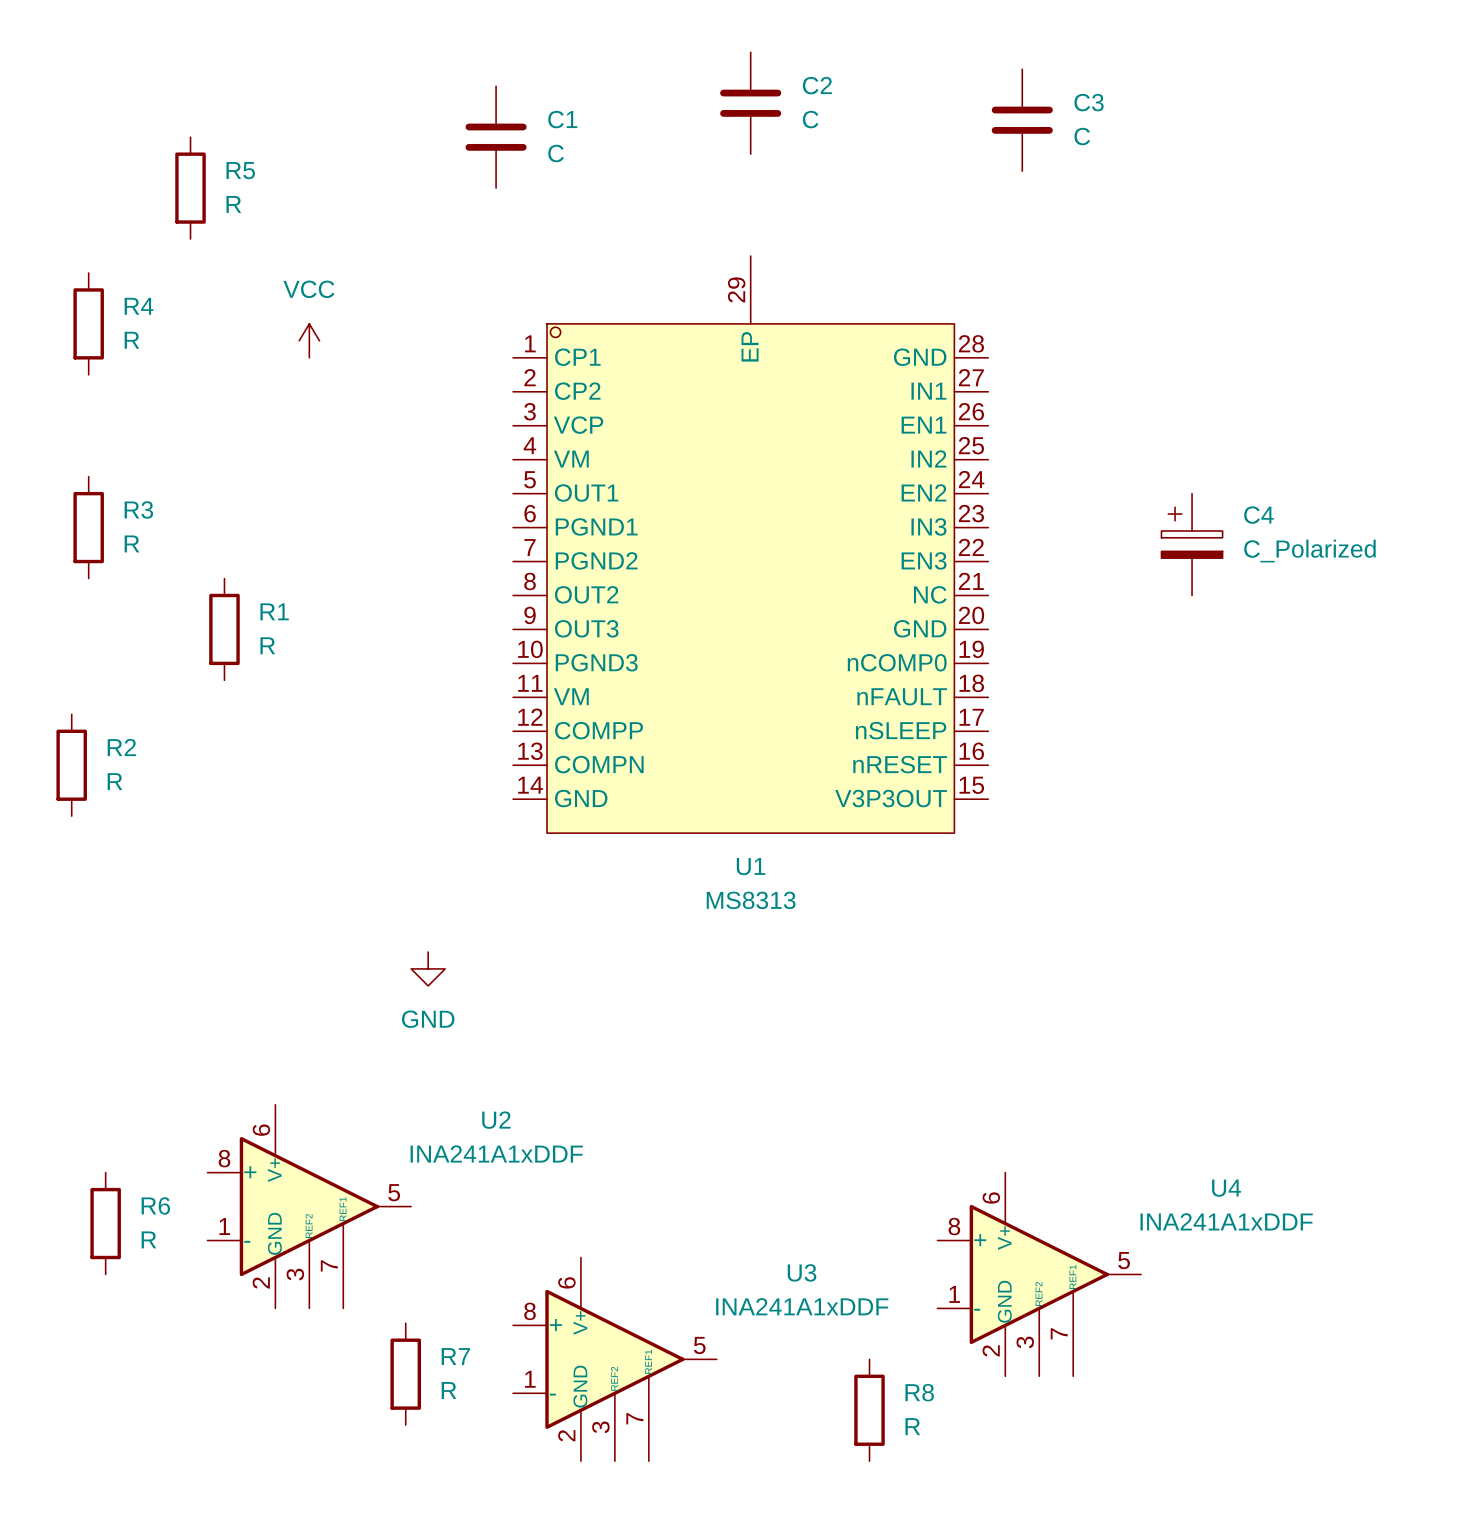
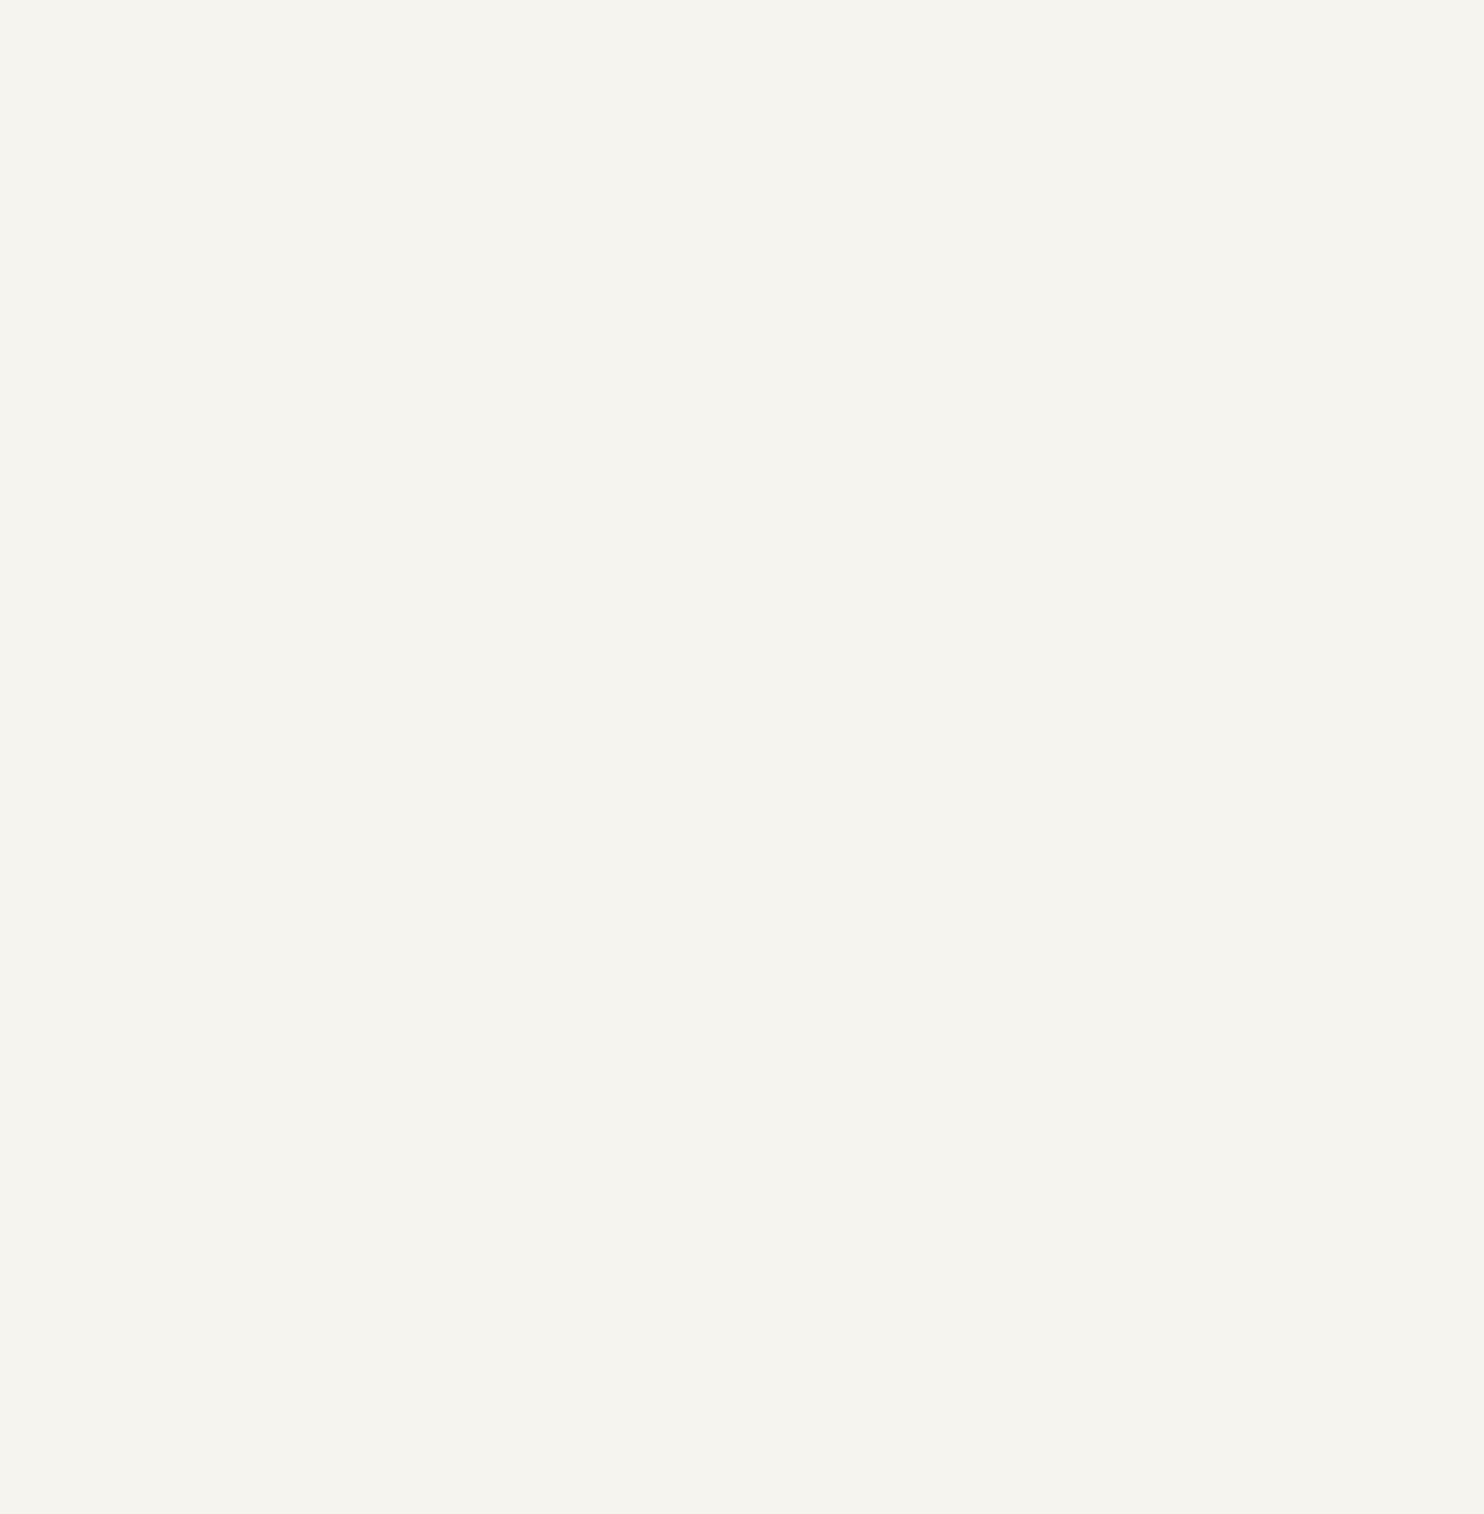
C2: C (750, 103) -> none
C3: C (1022, 120) -> none
C1: C (496, 137) -> none
R5: R (190, 188) -> none
R4: R (88, 323) -> none
power symbol: VCC (309, 340) -> none
R3: R (88, 527) -> none
U1: MS8313 (750, 544) -> none
C4: C_Polarized (1192, 544) -> none
R1: R (224, 629) -> none
R2: R (71, 765) -> none
power symbol: GND (428, 968) -> none
U2: INA241A1xDDF (309, 1206) -> none
R6: R (105, 1223) -> none
U4: INA241A1xDDF (1039, 1274) -> none
U3: INA241A1xDDF (614, 1359) -> none
R7: R (405, 1374) -> none
R8: R (869, 1410) -> none

